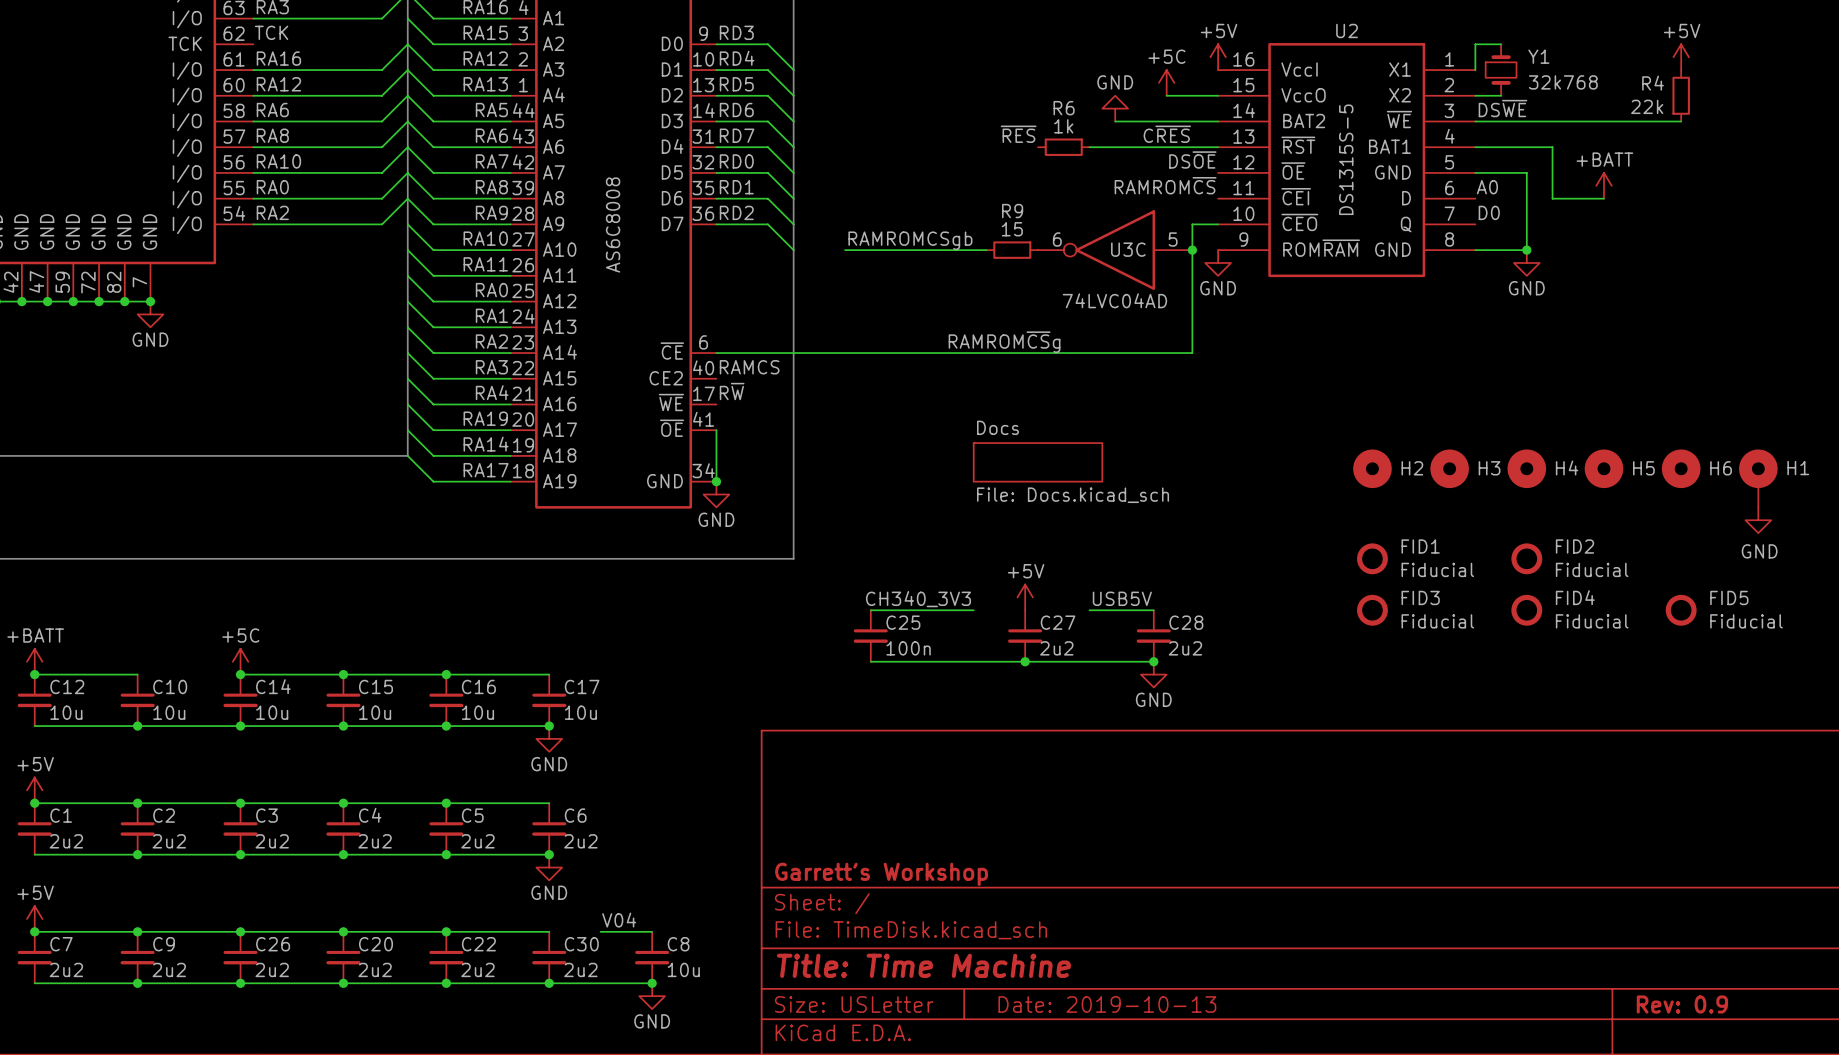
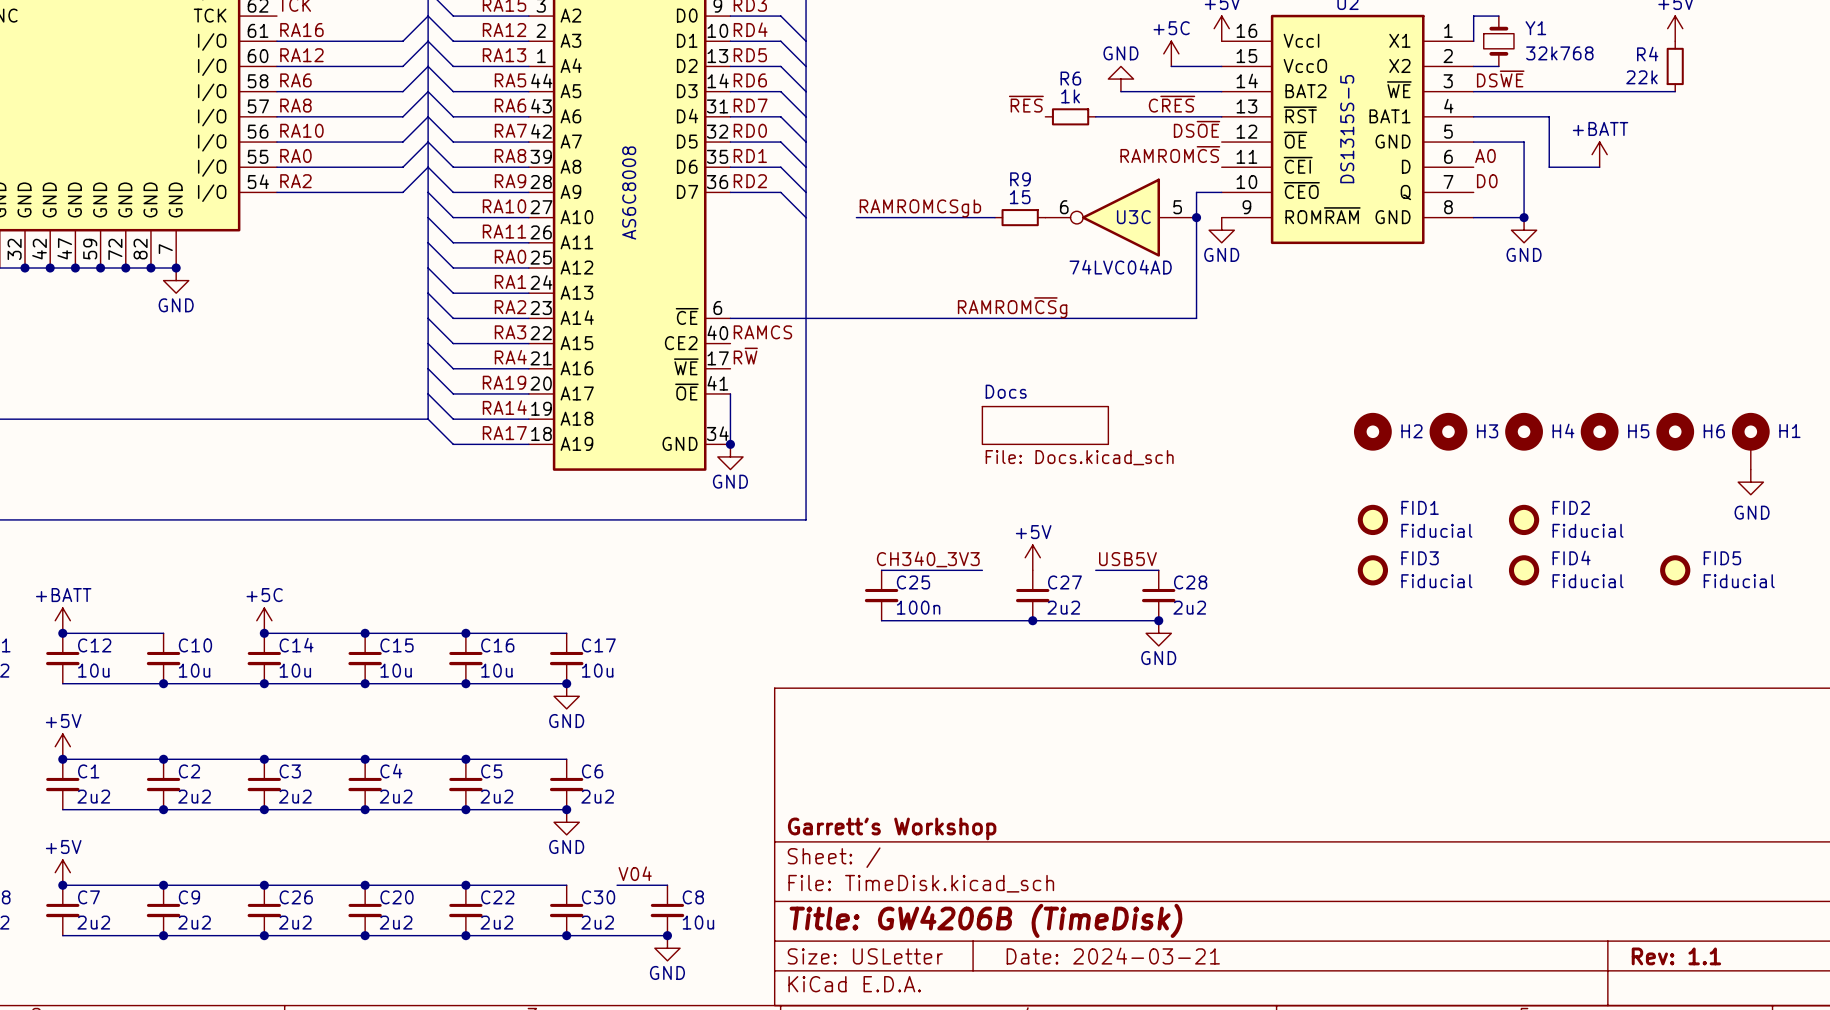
title block: Title: Time Machine (923, 965) -> Title: GW4206B (TimeDisk) (986, 920)
title block: Date: 2019-10-13 (1107, 1004) -> Date: 2024-03-21 (1113, 956)
title block: Rev: 0.9 (1682, 1004) -> Rev: 1.1 (1676, 956)

